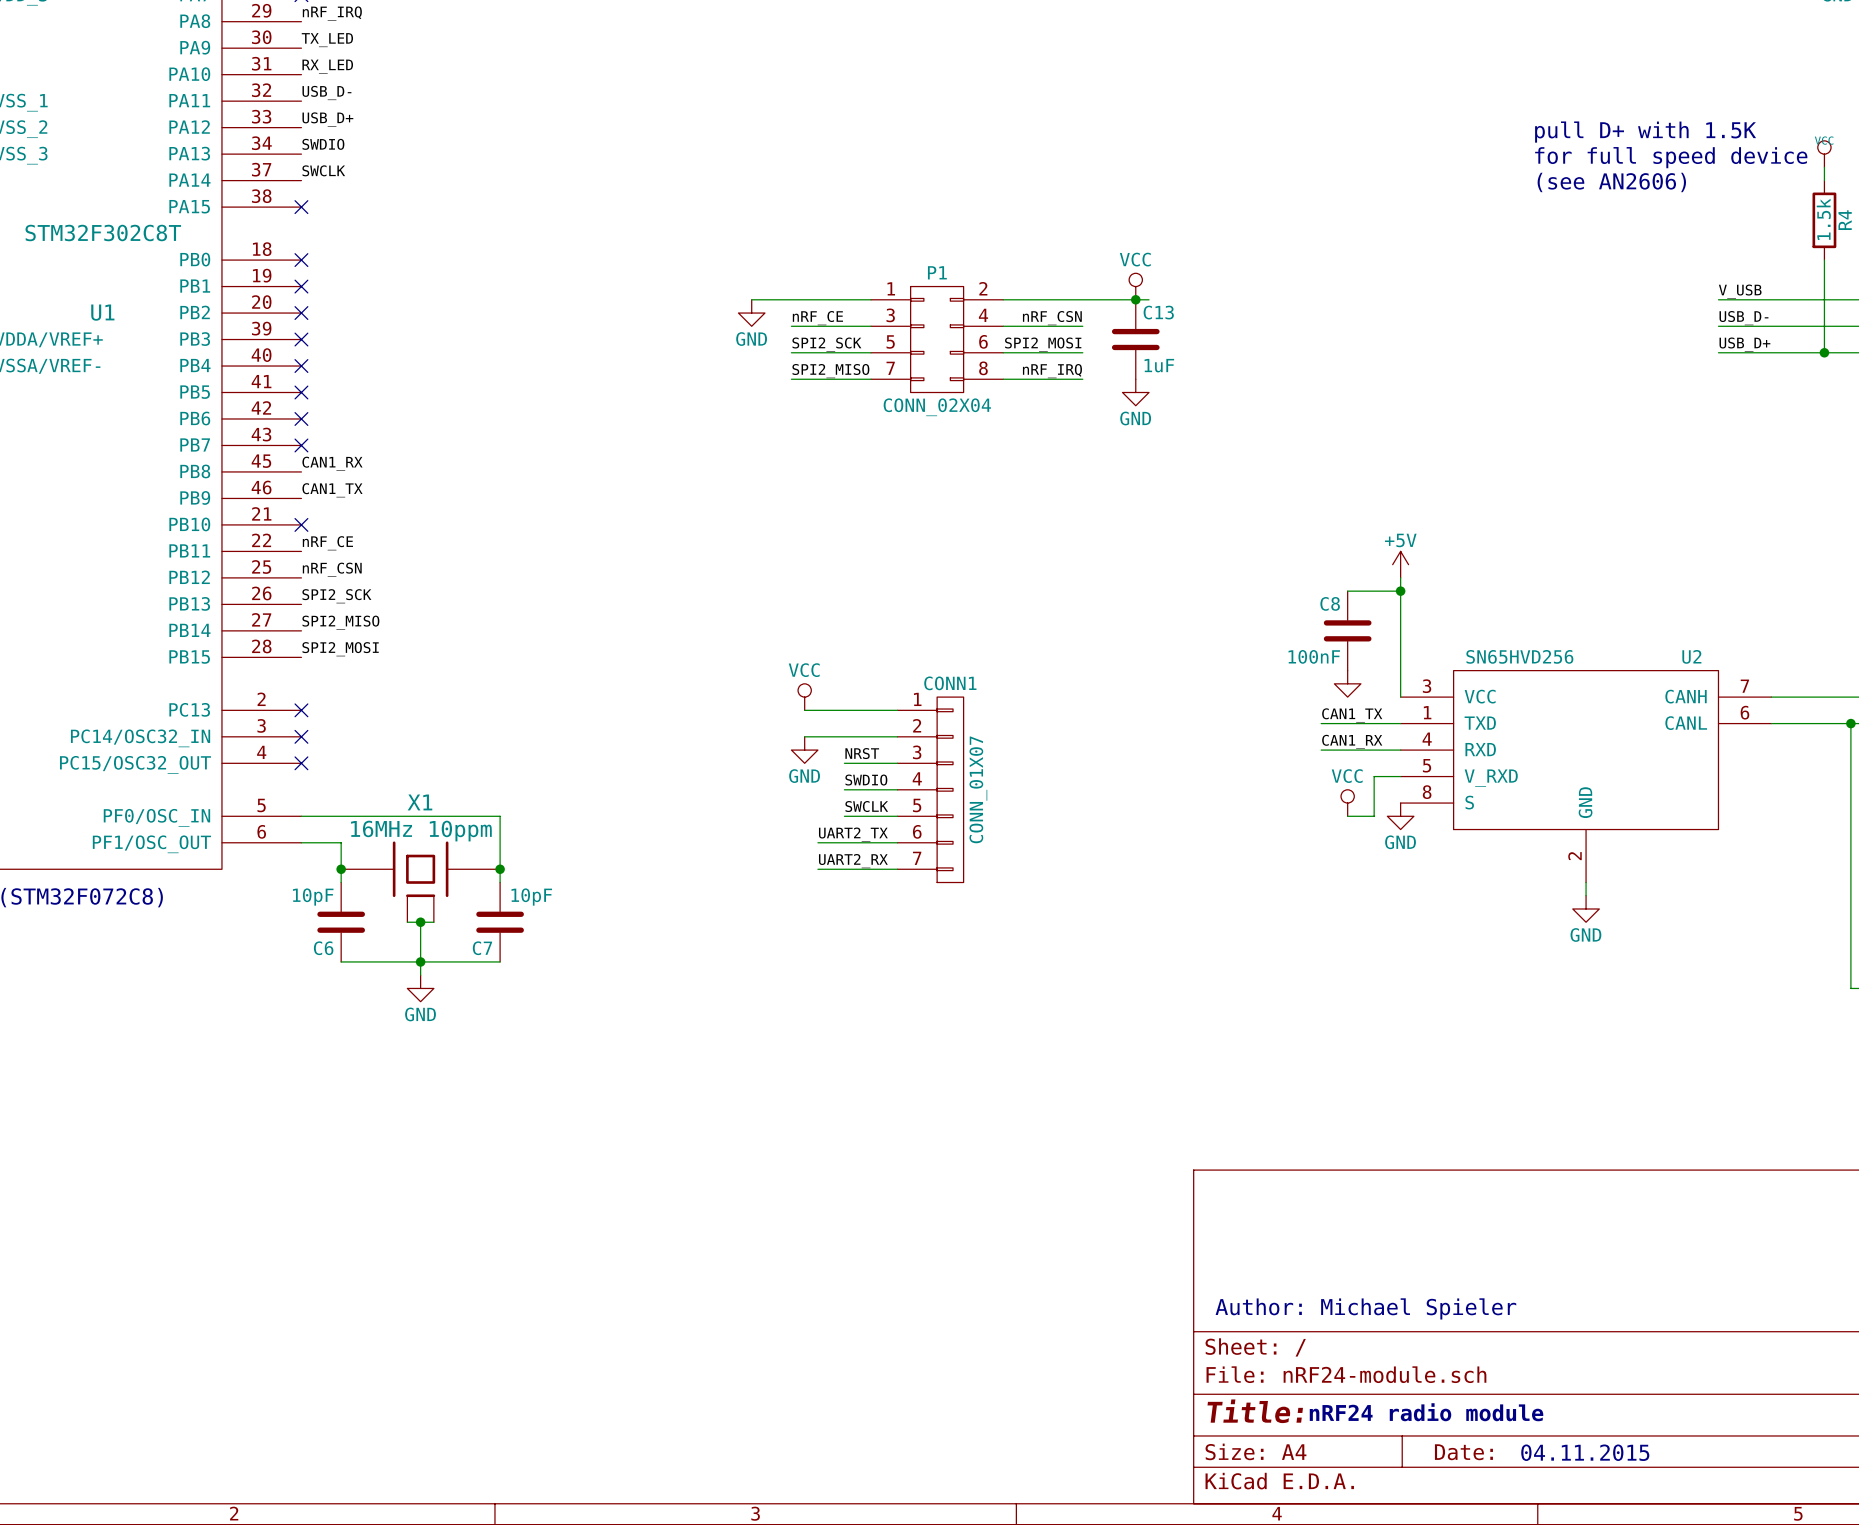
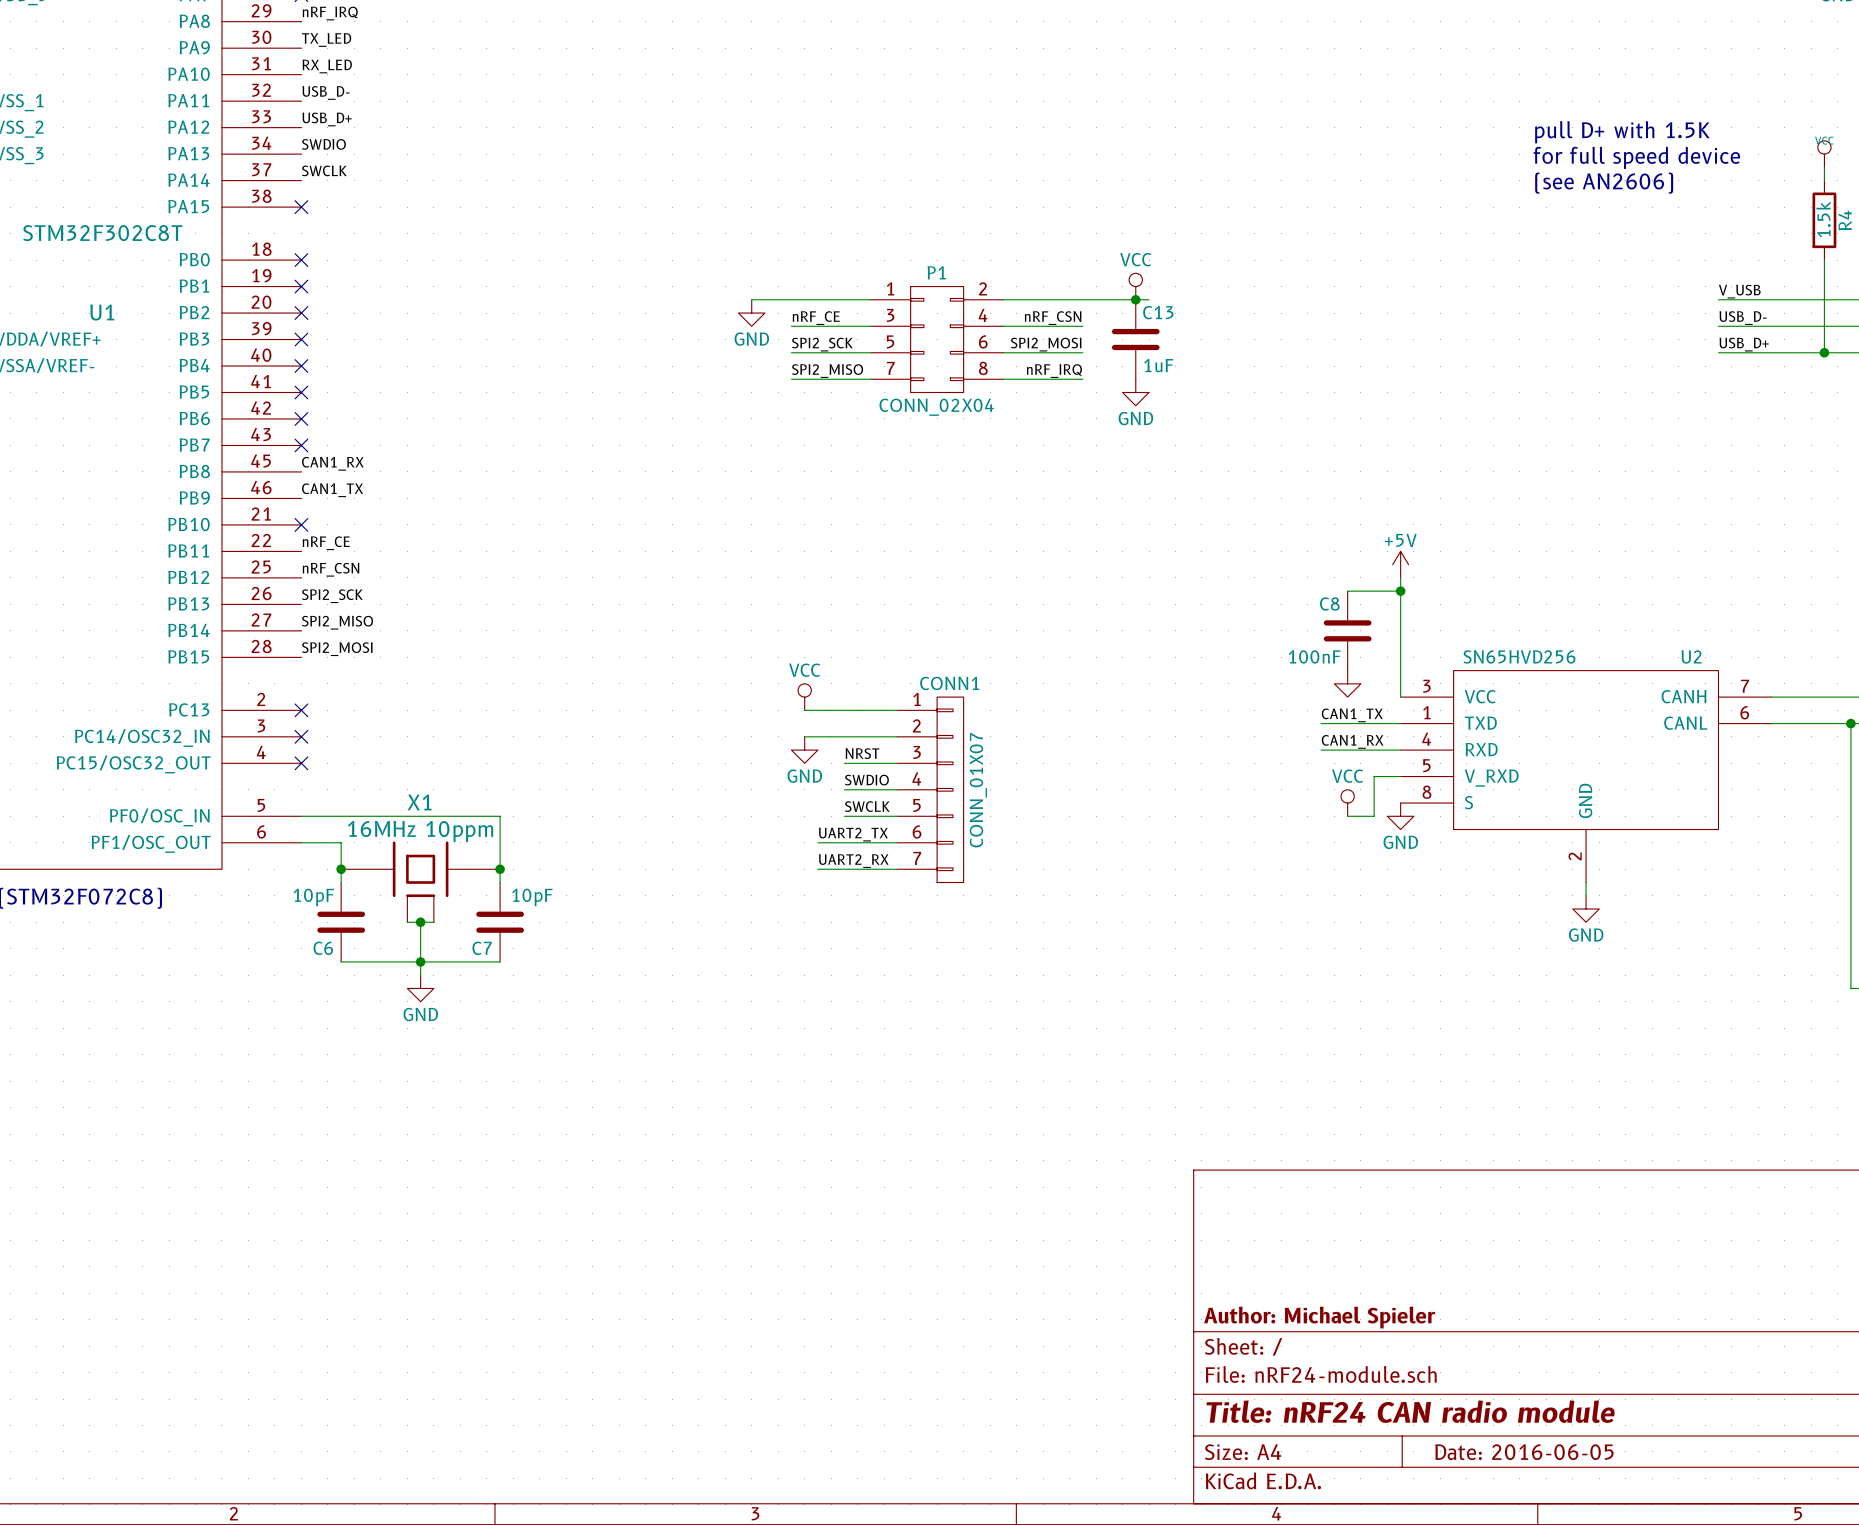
text: Author: Michael Spieler (1365, 1308) -> none
title block: none -> Author: Michael Spieler (1319, 1317)
title block: Title: (1255, 1411) -> Title: nRF24 CAN radio module (1410, 1411)
text: nRF24 radio module (1426, 1412) -> none
title block: Date: (1463, 1452) -> Date: 2016-06-05 (1524, 1452)
text: 04.11.2015 (1585, 1452) -> none

